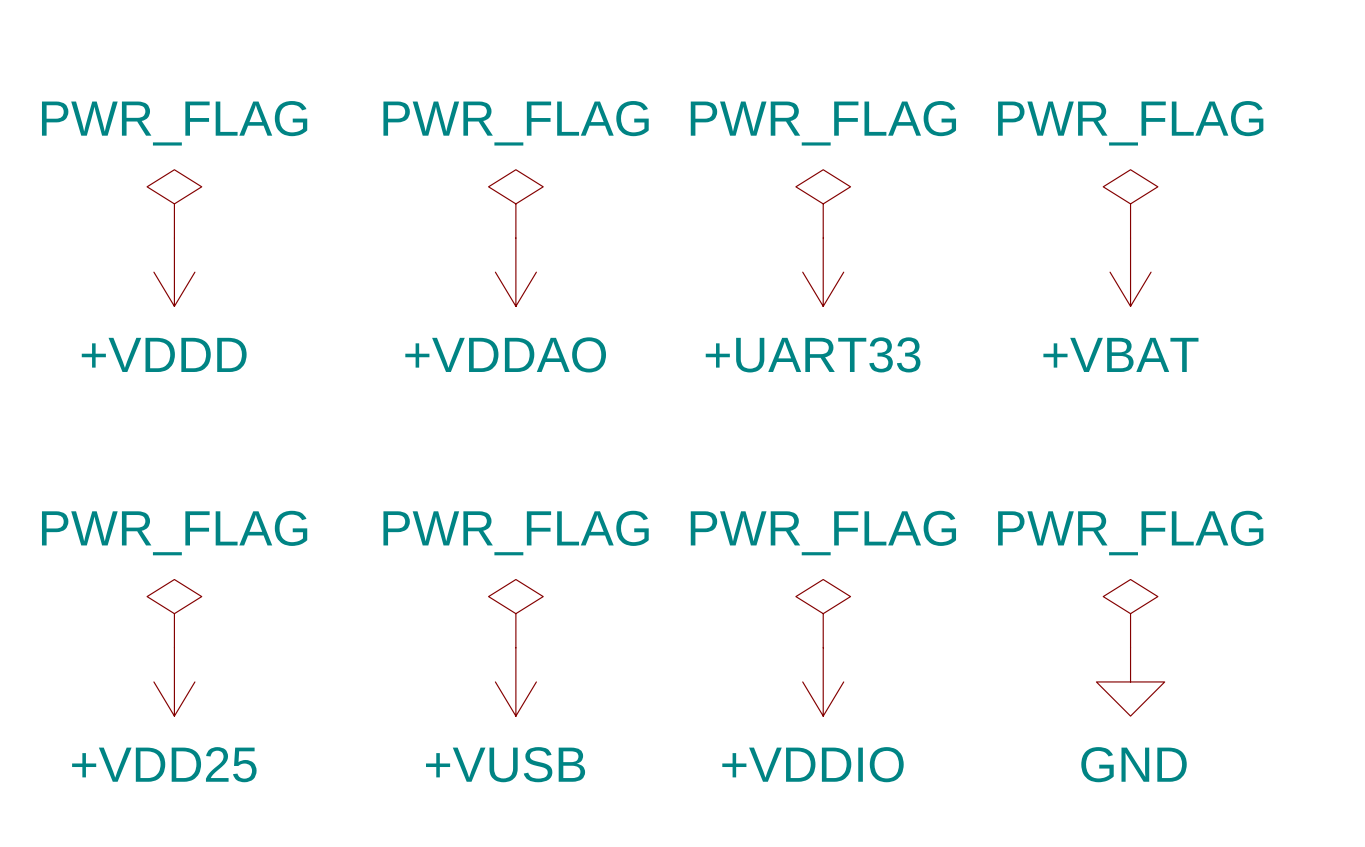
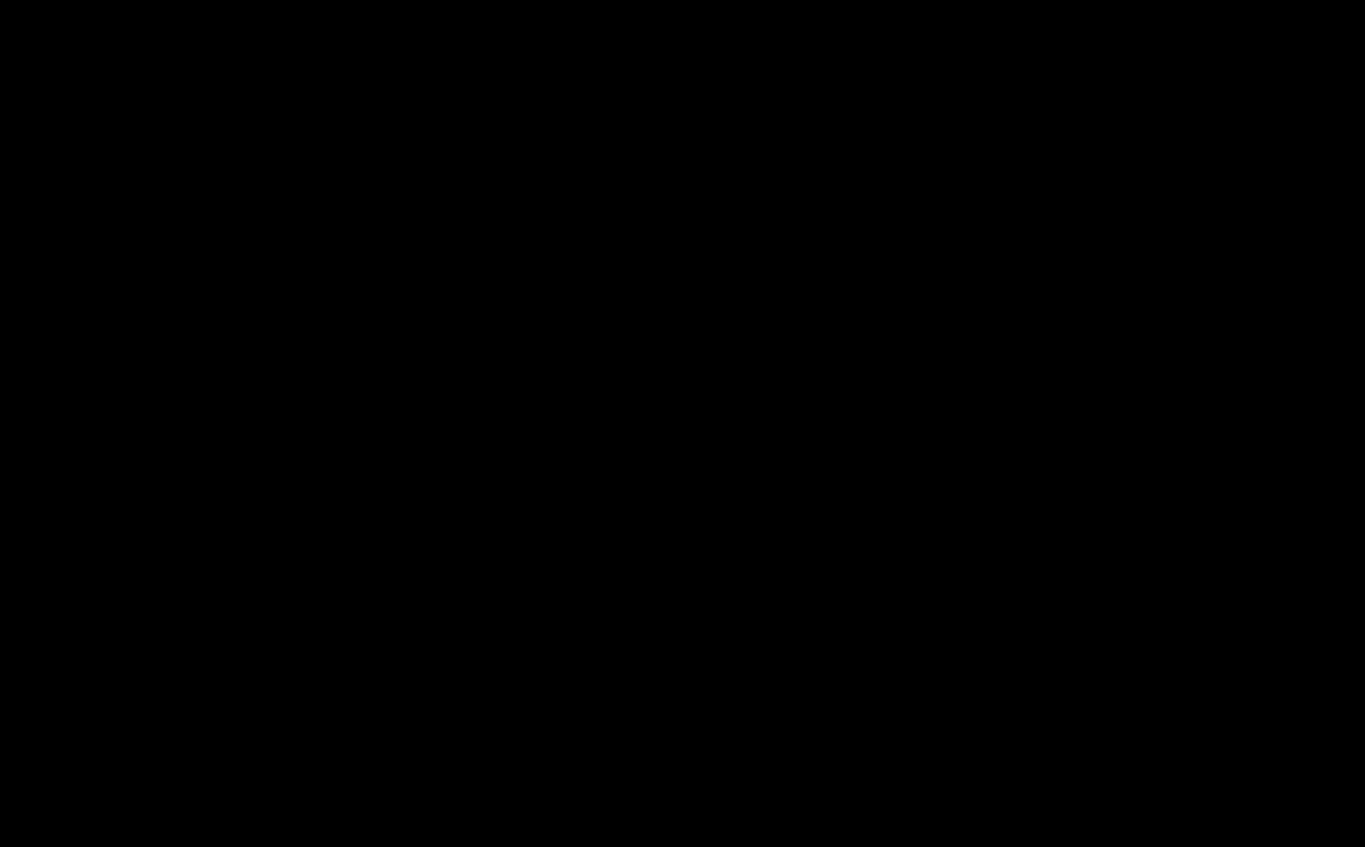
power symbol: PWR_FLAG (174, 203) -> none
power symbol: PWR_FLAG (515, 203) -> none
power symbol: PWR_FLAG (823, 203) -> none
power symbol: PWR_FLAG (1130, 203) -> none
power symbol: +VDDD (174, 272) -> none
power symbol: +VDDAO (515, 272) -> none
power symbol: +UART33 (823, 272) -> none
power symbol: +VBAT (1130, 272) -> none
power symbol: PWR_FLAG (174, 613) -> none
power symbol: PWR_FLAG (515, 613) -> none
power symbol: PWR_FLAG (823, 613) -> none
power symbol: PWR_FLAG (1130, 613) -> none
power symbol: +VDD25 (174, 681) -> none
power symbol: +VUSB (515, 681) -> none
power symbol: +VDDIO (823, 681) -> none
power symbol: GND (1130, 681) -> none

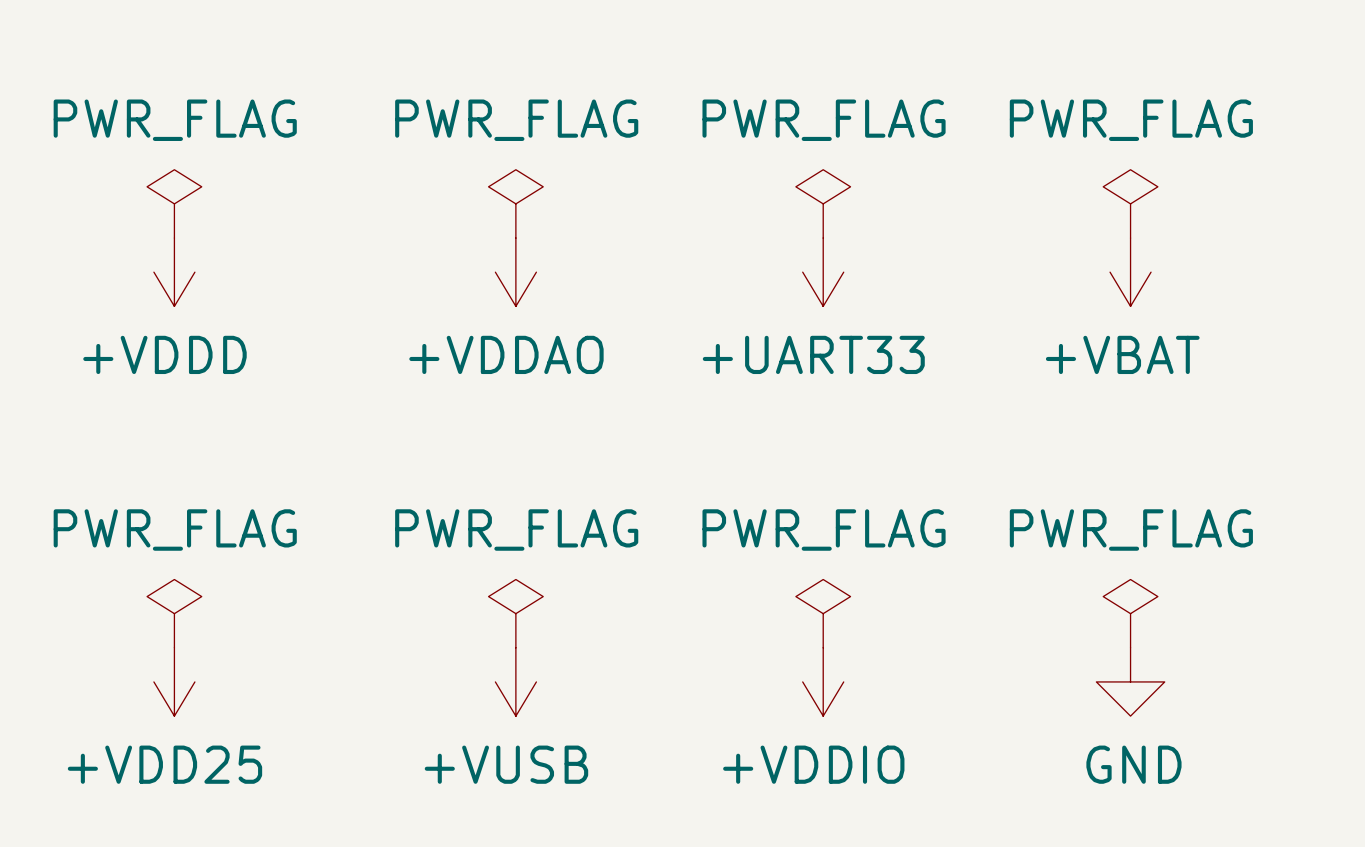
power symbol: none -> PWR_FLAG (174, 203)
power symbol: none -> PWR_FLAG (515, 203)
power symbol: none -> PWR_FLAG (823, 203)
power symbol: none -> PWR_FLAG (1130, 203)
power symbol: none -> +VDDD (174, 272)
power symbol: none -> +VDDAO (515, 272)
power symbol: none -> +UART33 (823, 272)
power symbol: none -> +VBAT (1130, 272)
power symbol: none -> PWR_FLAG (174, 613)
power symbol: none -> PWR_FLAG (515, 613)
power symbol: none -> PWR_FLAG (823, 613)
power symbol: none -> PWR_FLAG (1130, 613)
power symbol: none -> +VDD25 (174, 681)
power symbol: none -> +VUSB (515, 681)
power symbol: none -> +VDDIO (823, 681)
power symbol: none -> GND (1130, 681)

